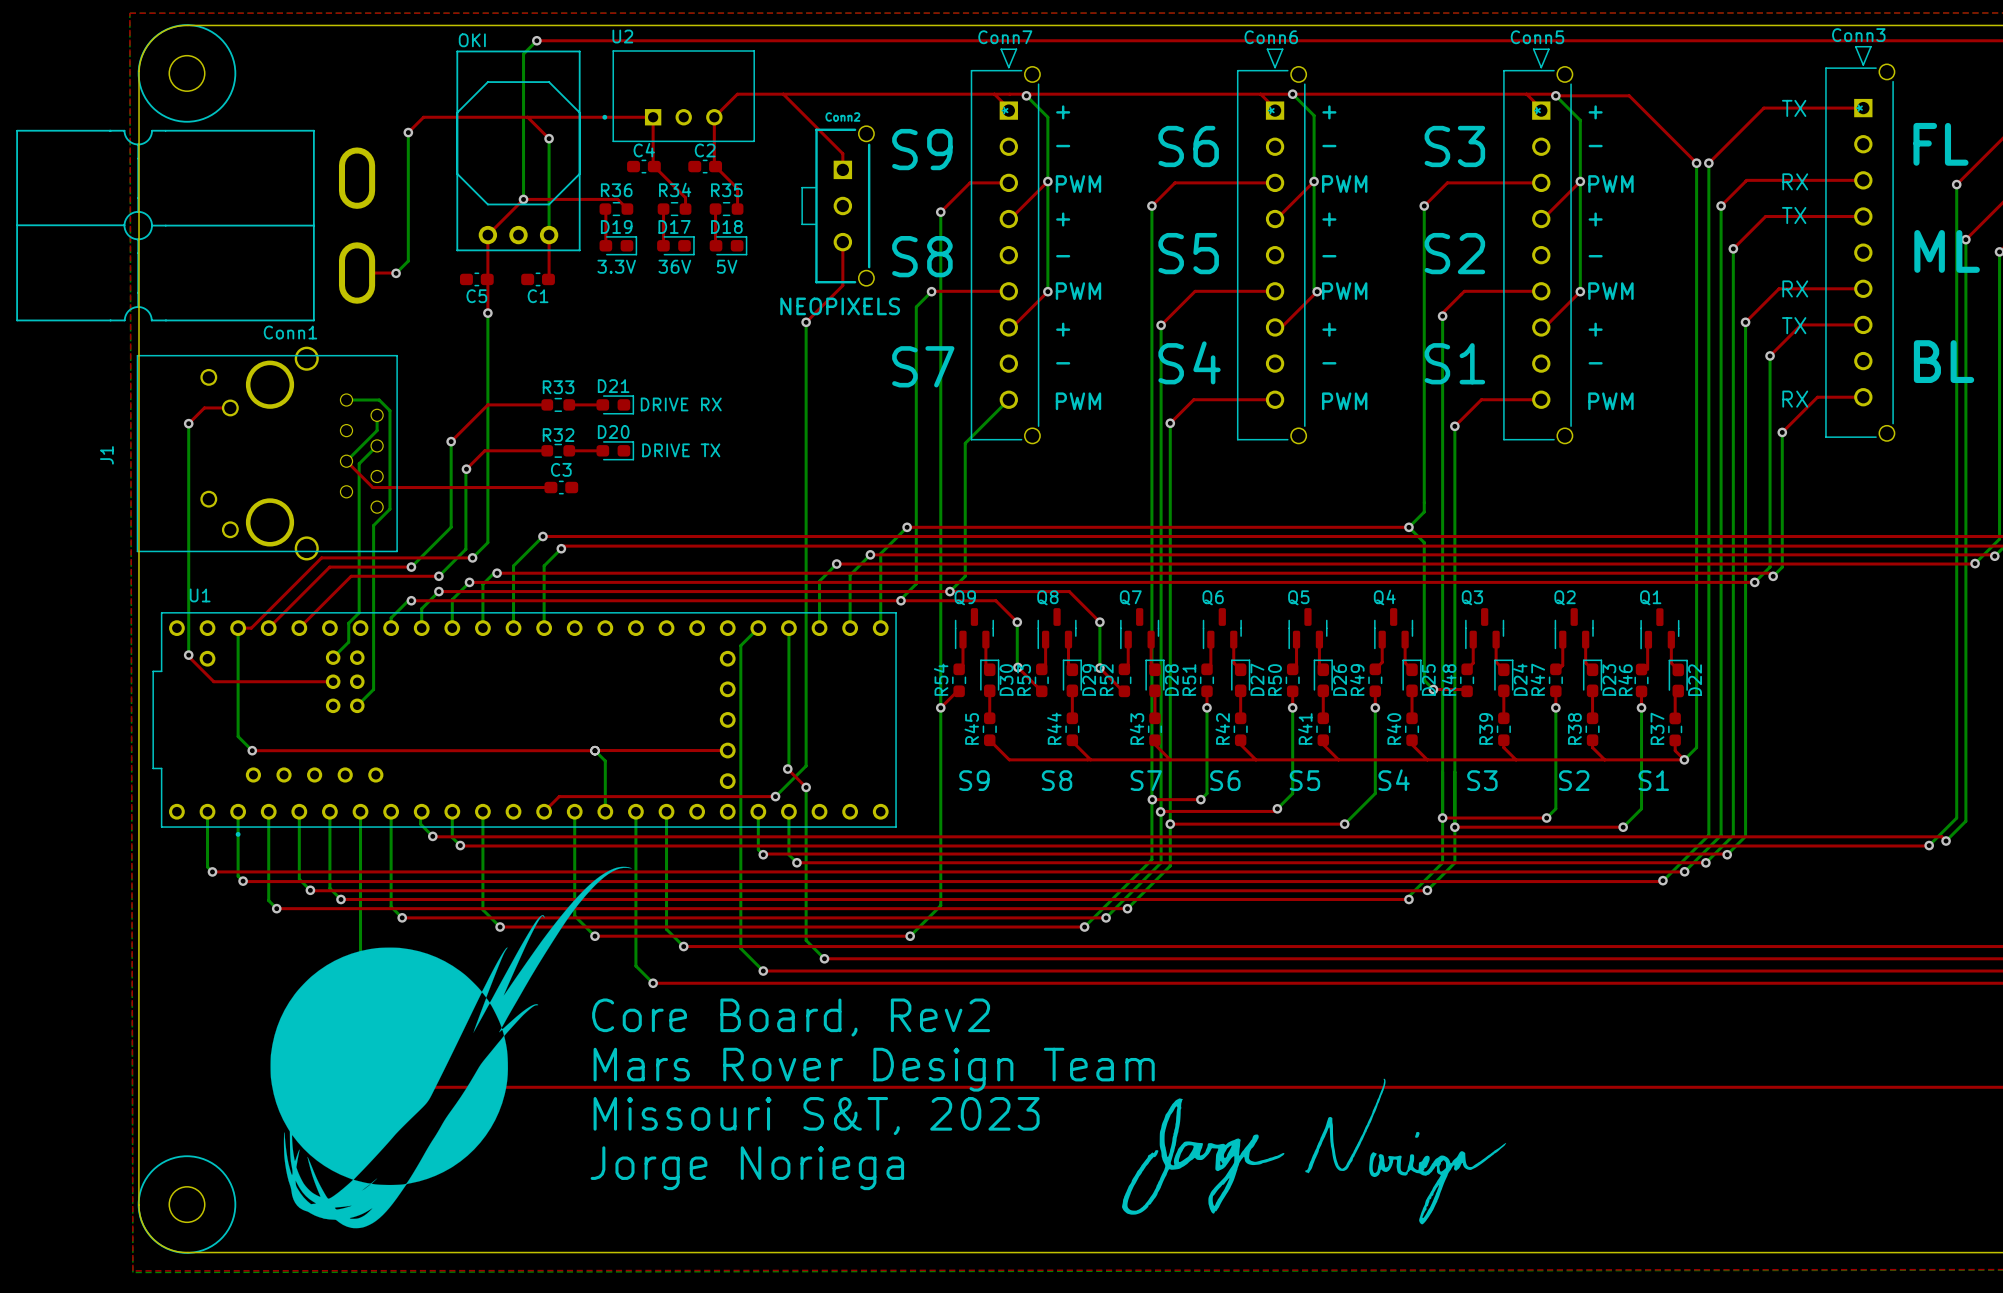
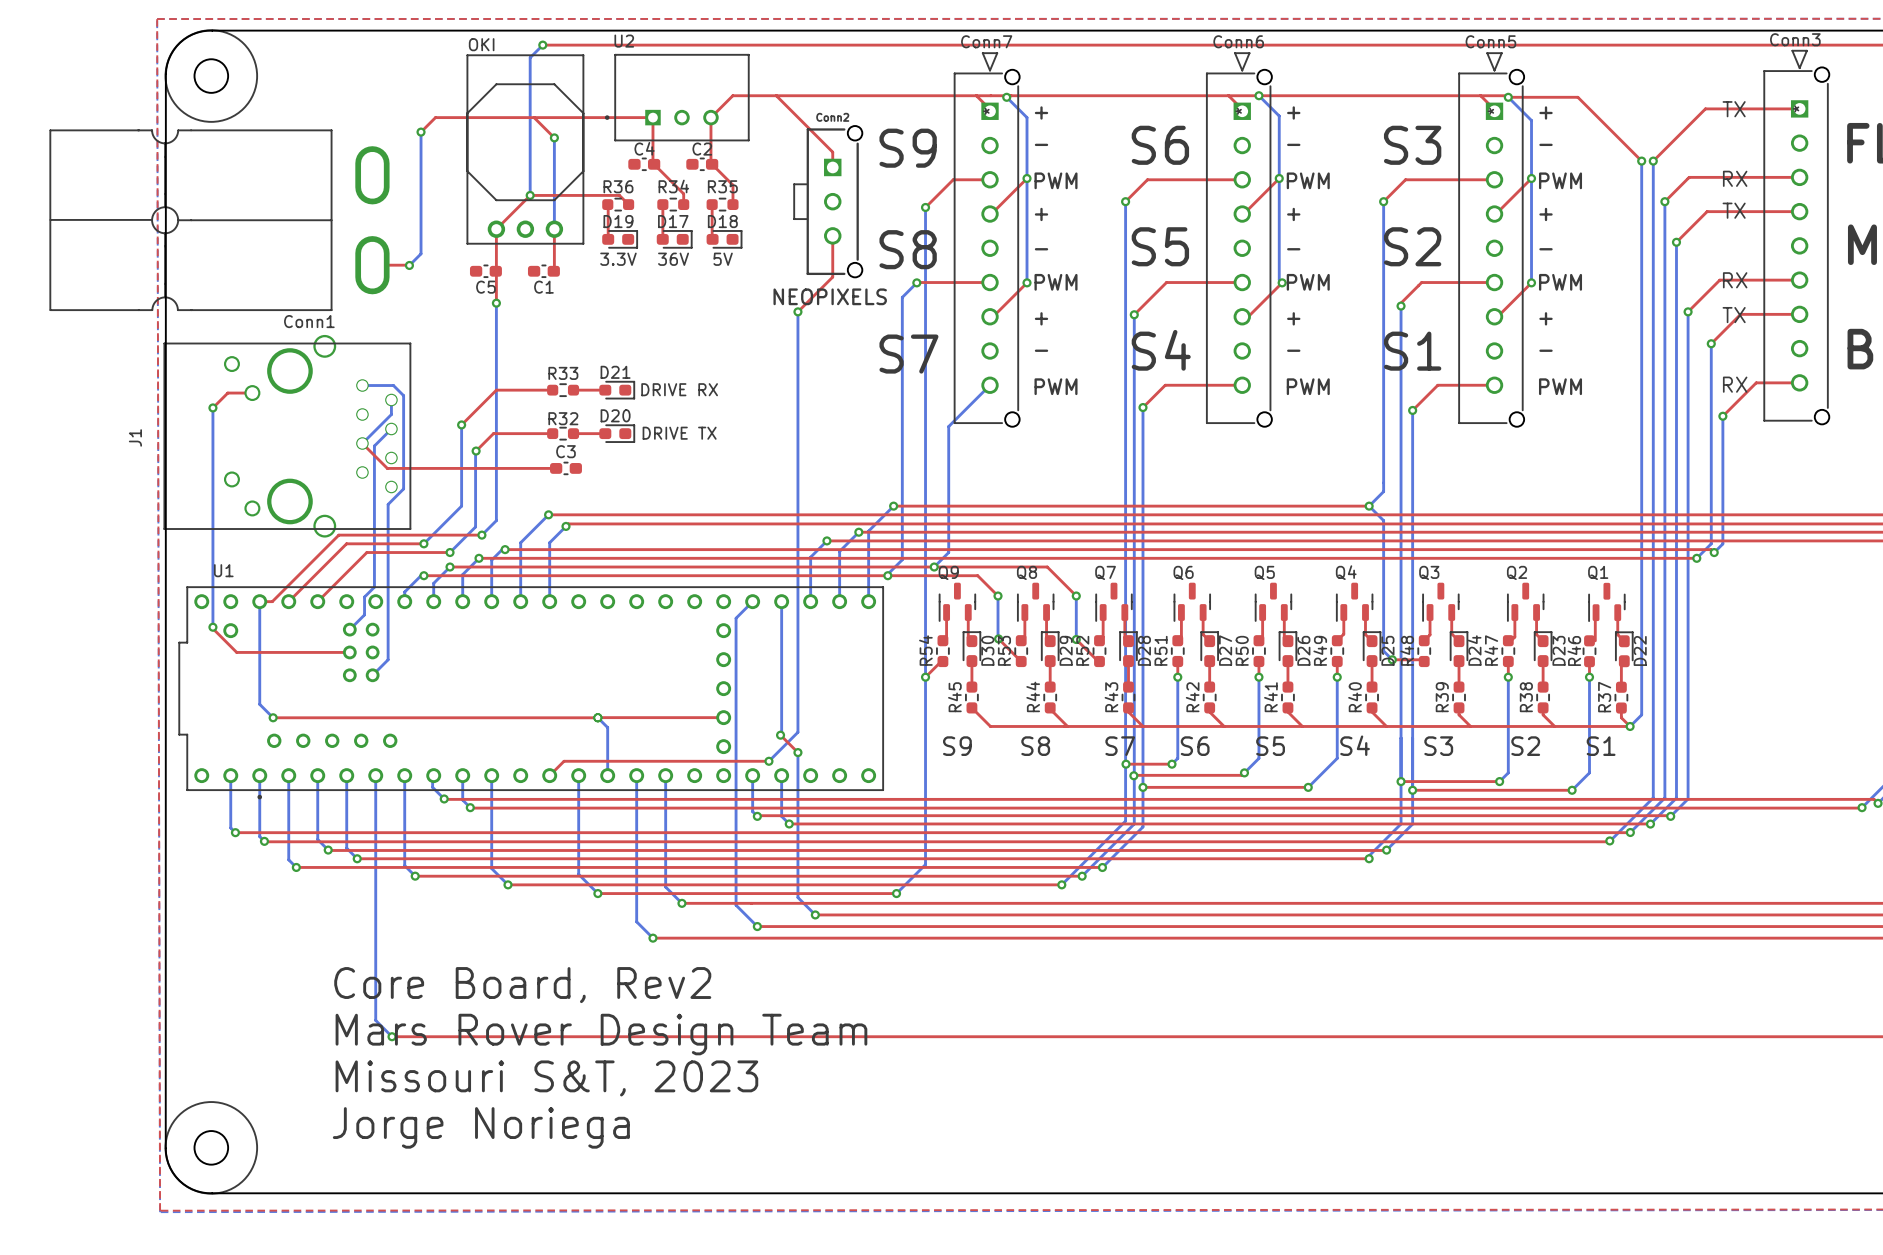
drawing: [270, 866, 632, 1229] -> none
text position: Core Board, Rev2 (791, 1017) -> Core Board, Rev2 (522, 985)
text position: Mars Rover Design Team (874, 1069) -> Mars Rover Design Team (601, 1034)
drawing: [1122, 1078, 1507, 1225] -> none
text position: Missouri S&T, 2023 (816, 1116) -> Missouri S&T, 2023 (546, 1078)
text position: Jorge Noriega (747, 1168) -> Jorge Noriega (481, 1127)

